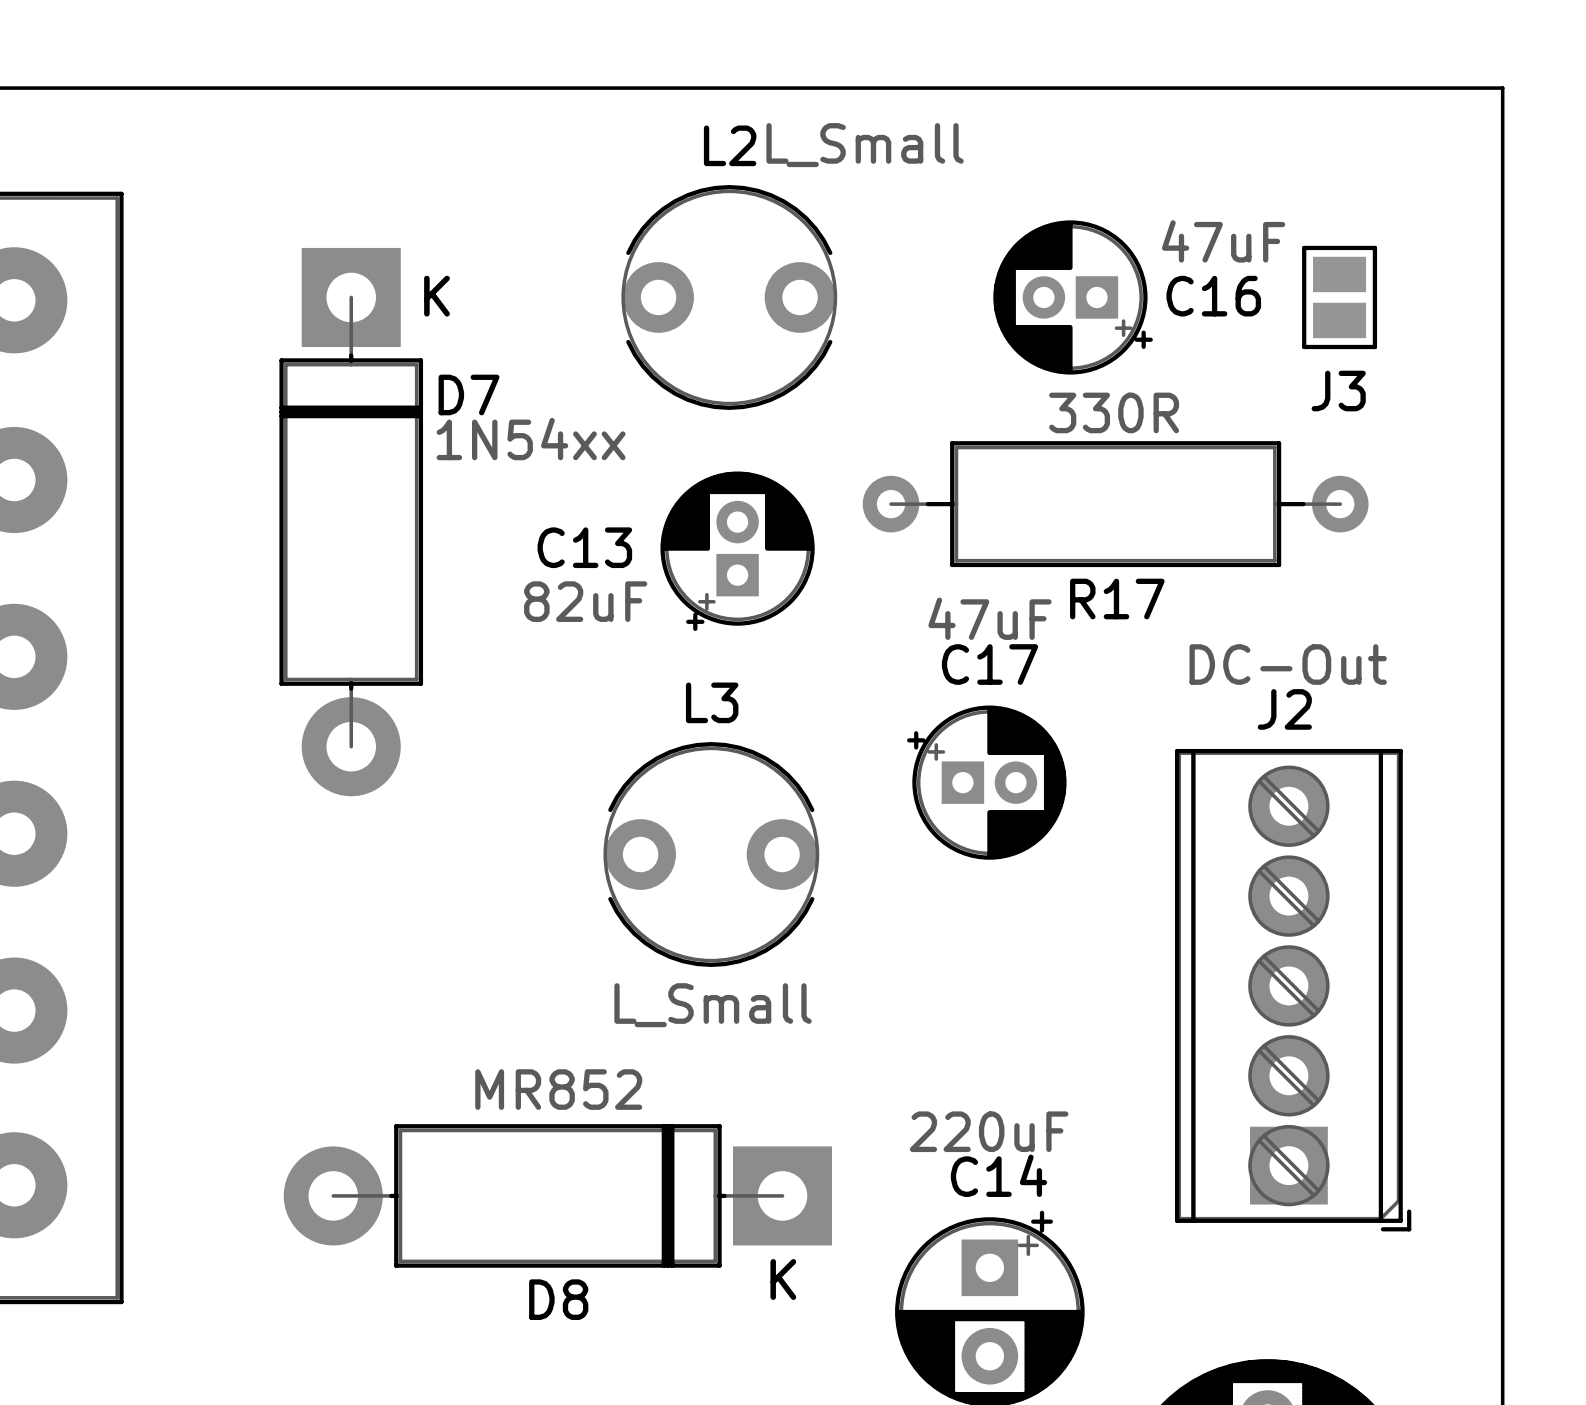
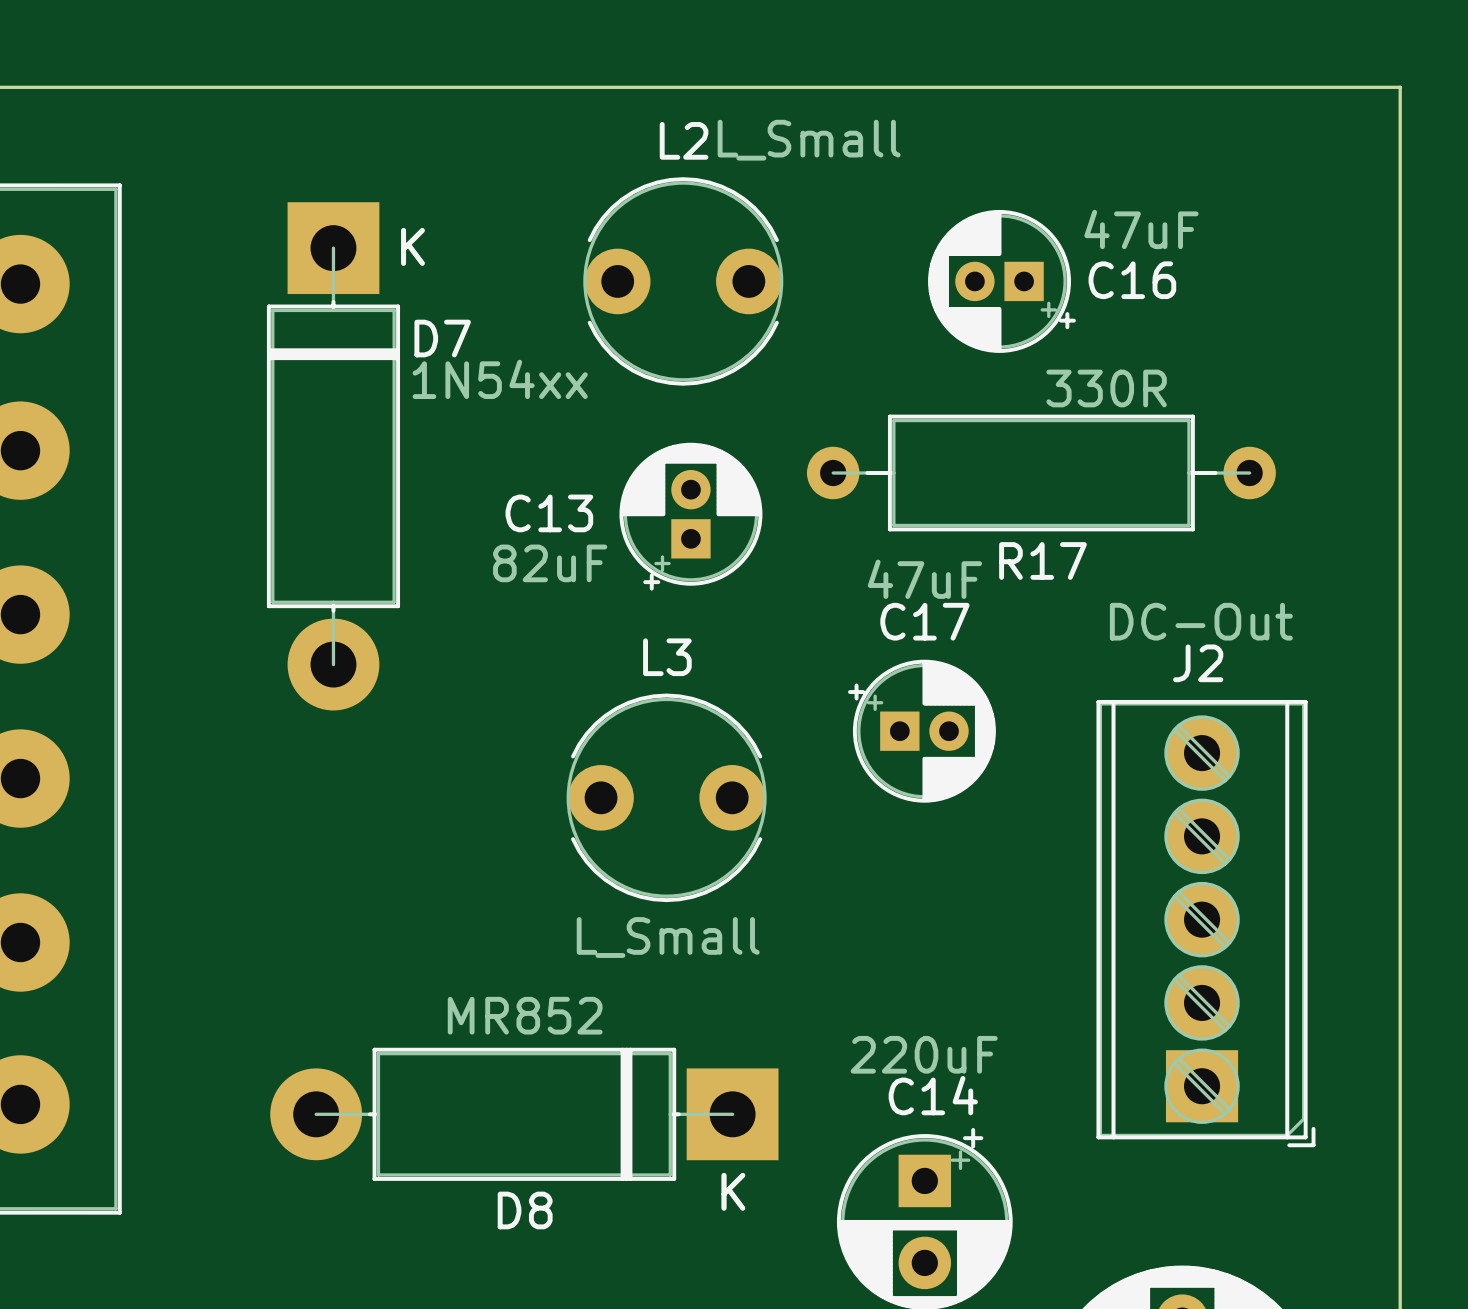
J3: (1339, 297) -> none
R17 value position: 330R (1114, 412) -> 330R (1106, 388)
D7 position: (351, 522) -> (333, 456)

